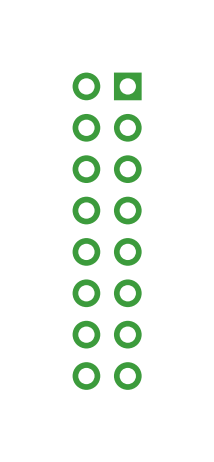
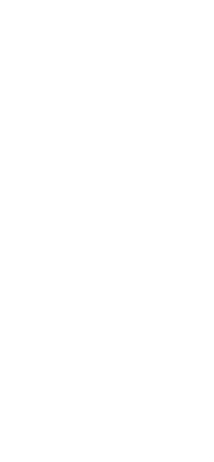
part: (107, 231) -> none

